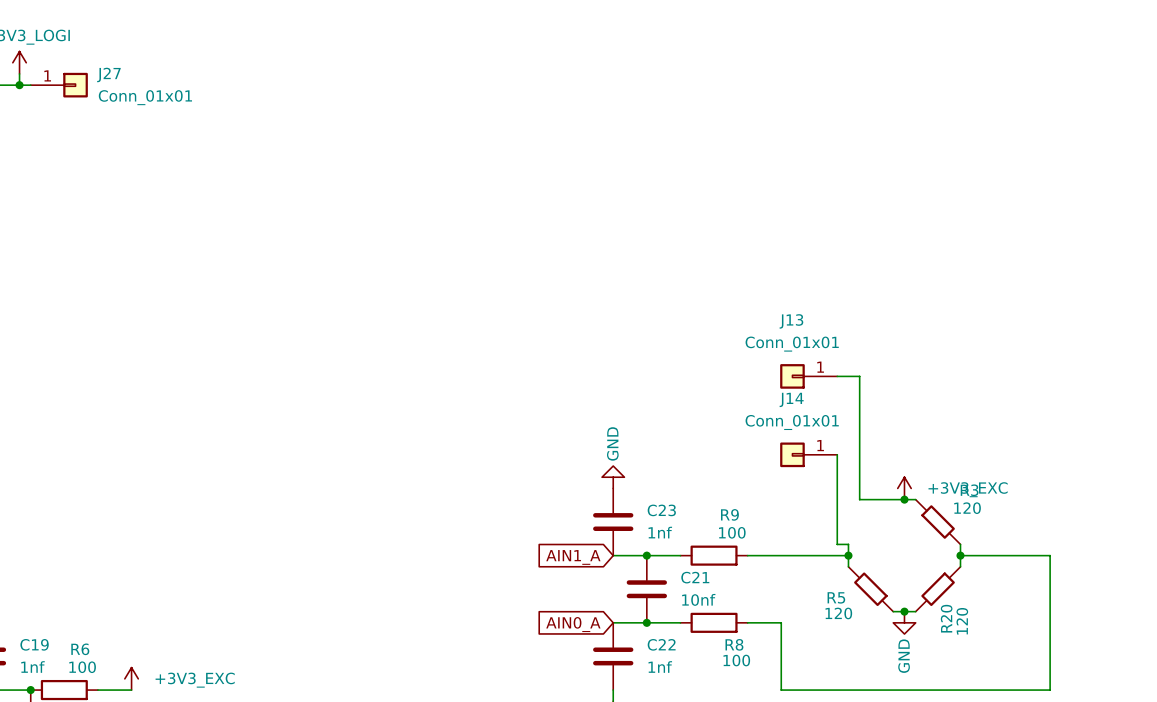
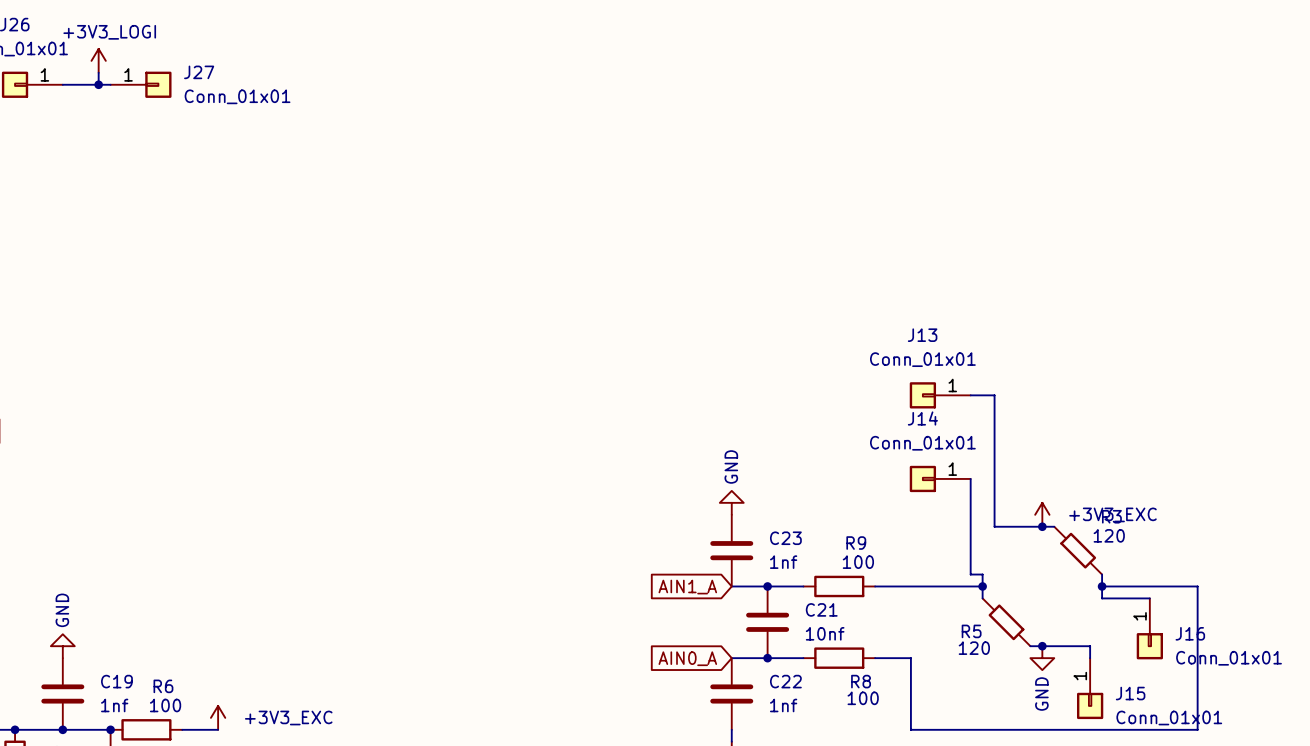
wire: none -> (1102, 598) (1149, 598)
R20: 120 (938, 589) -> none
J16: none -> Conn_01x01 (1149, 628)
wire: none -> (1054, 646) (1090, 646) (1090, 658)
J15: none -> Conn_01x01 (1090, 688)

